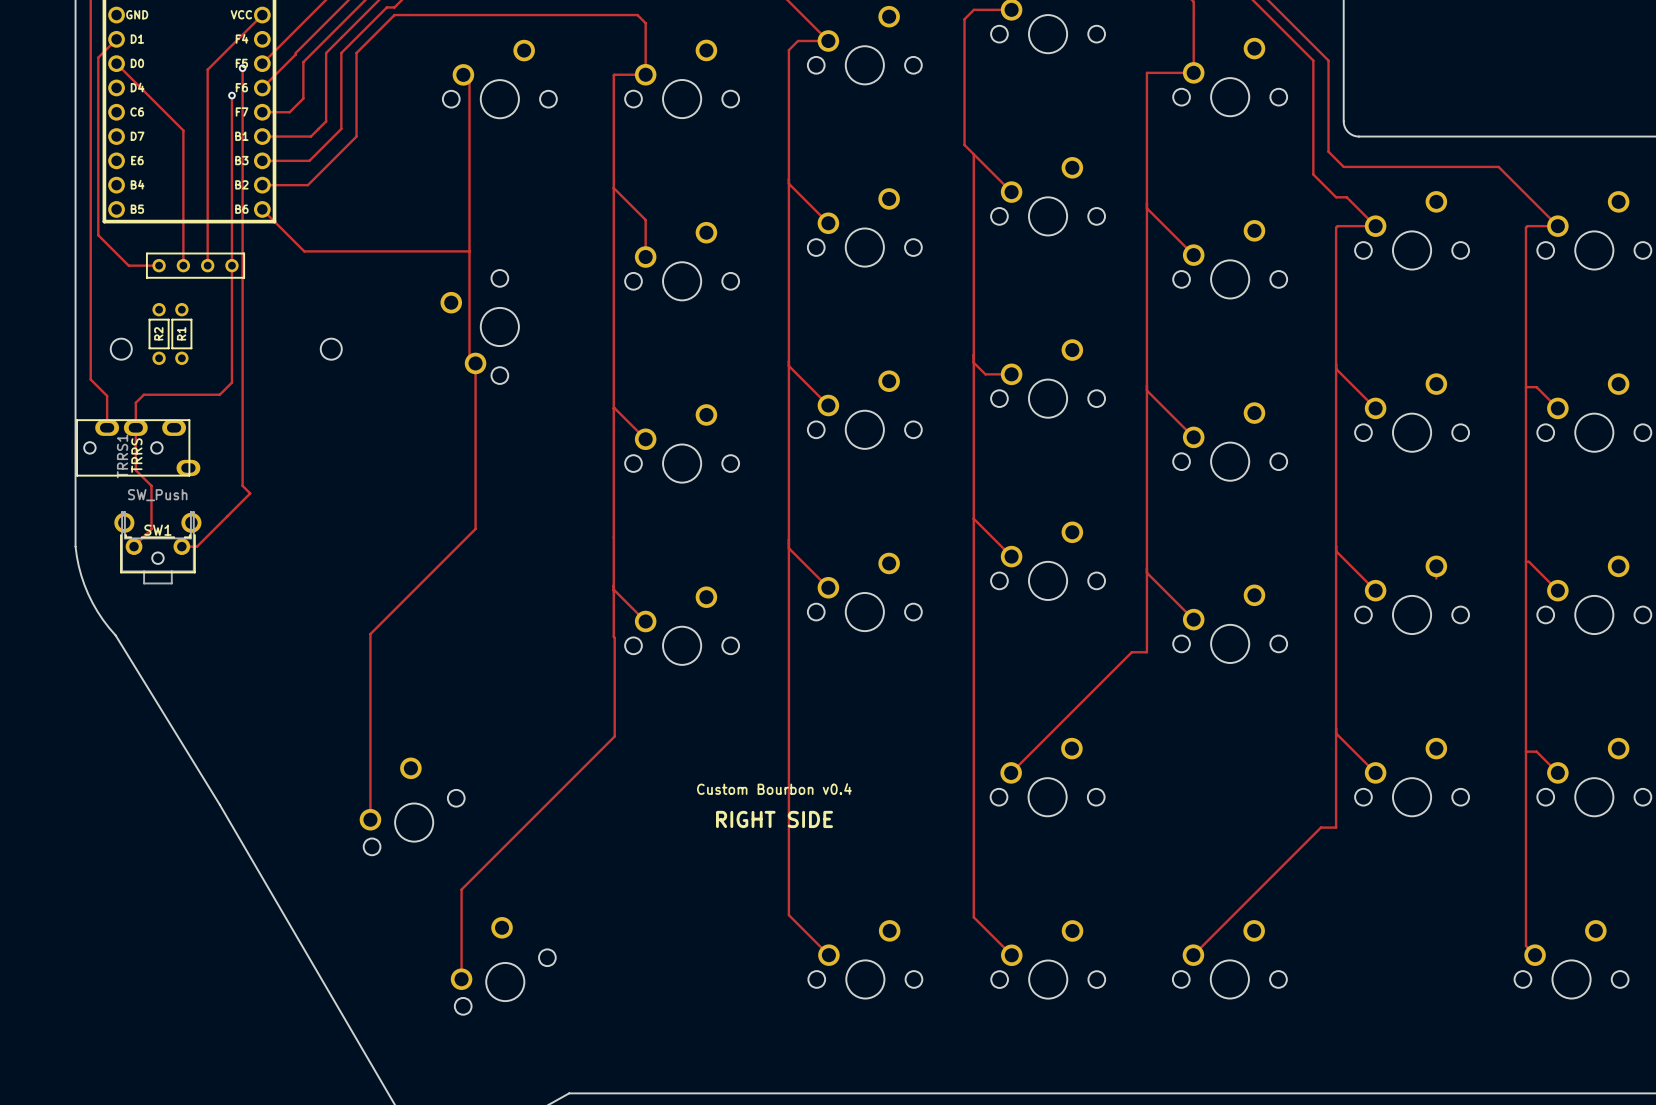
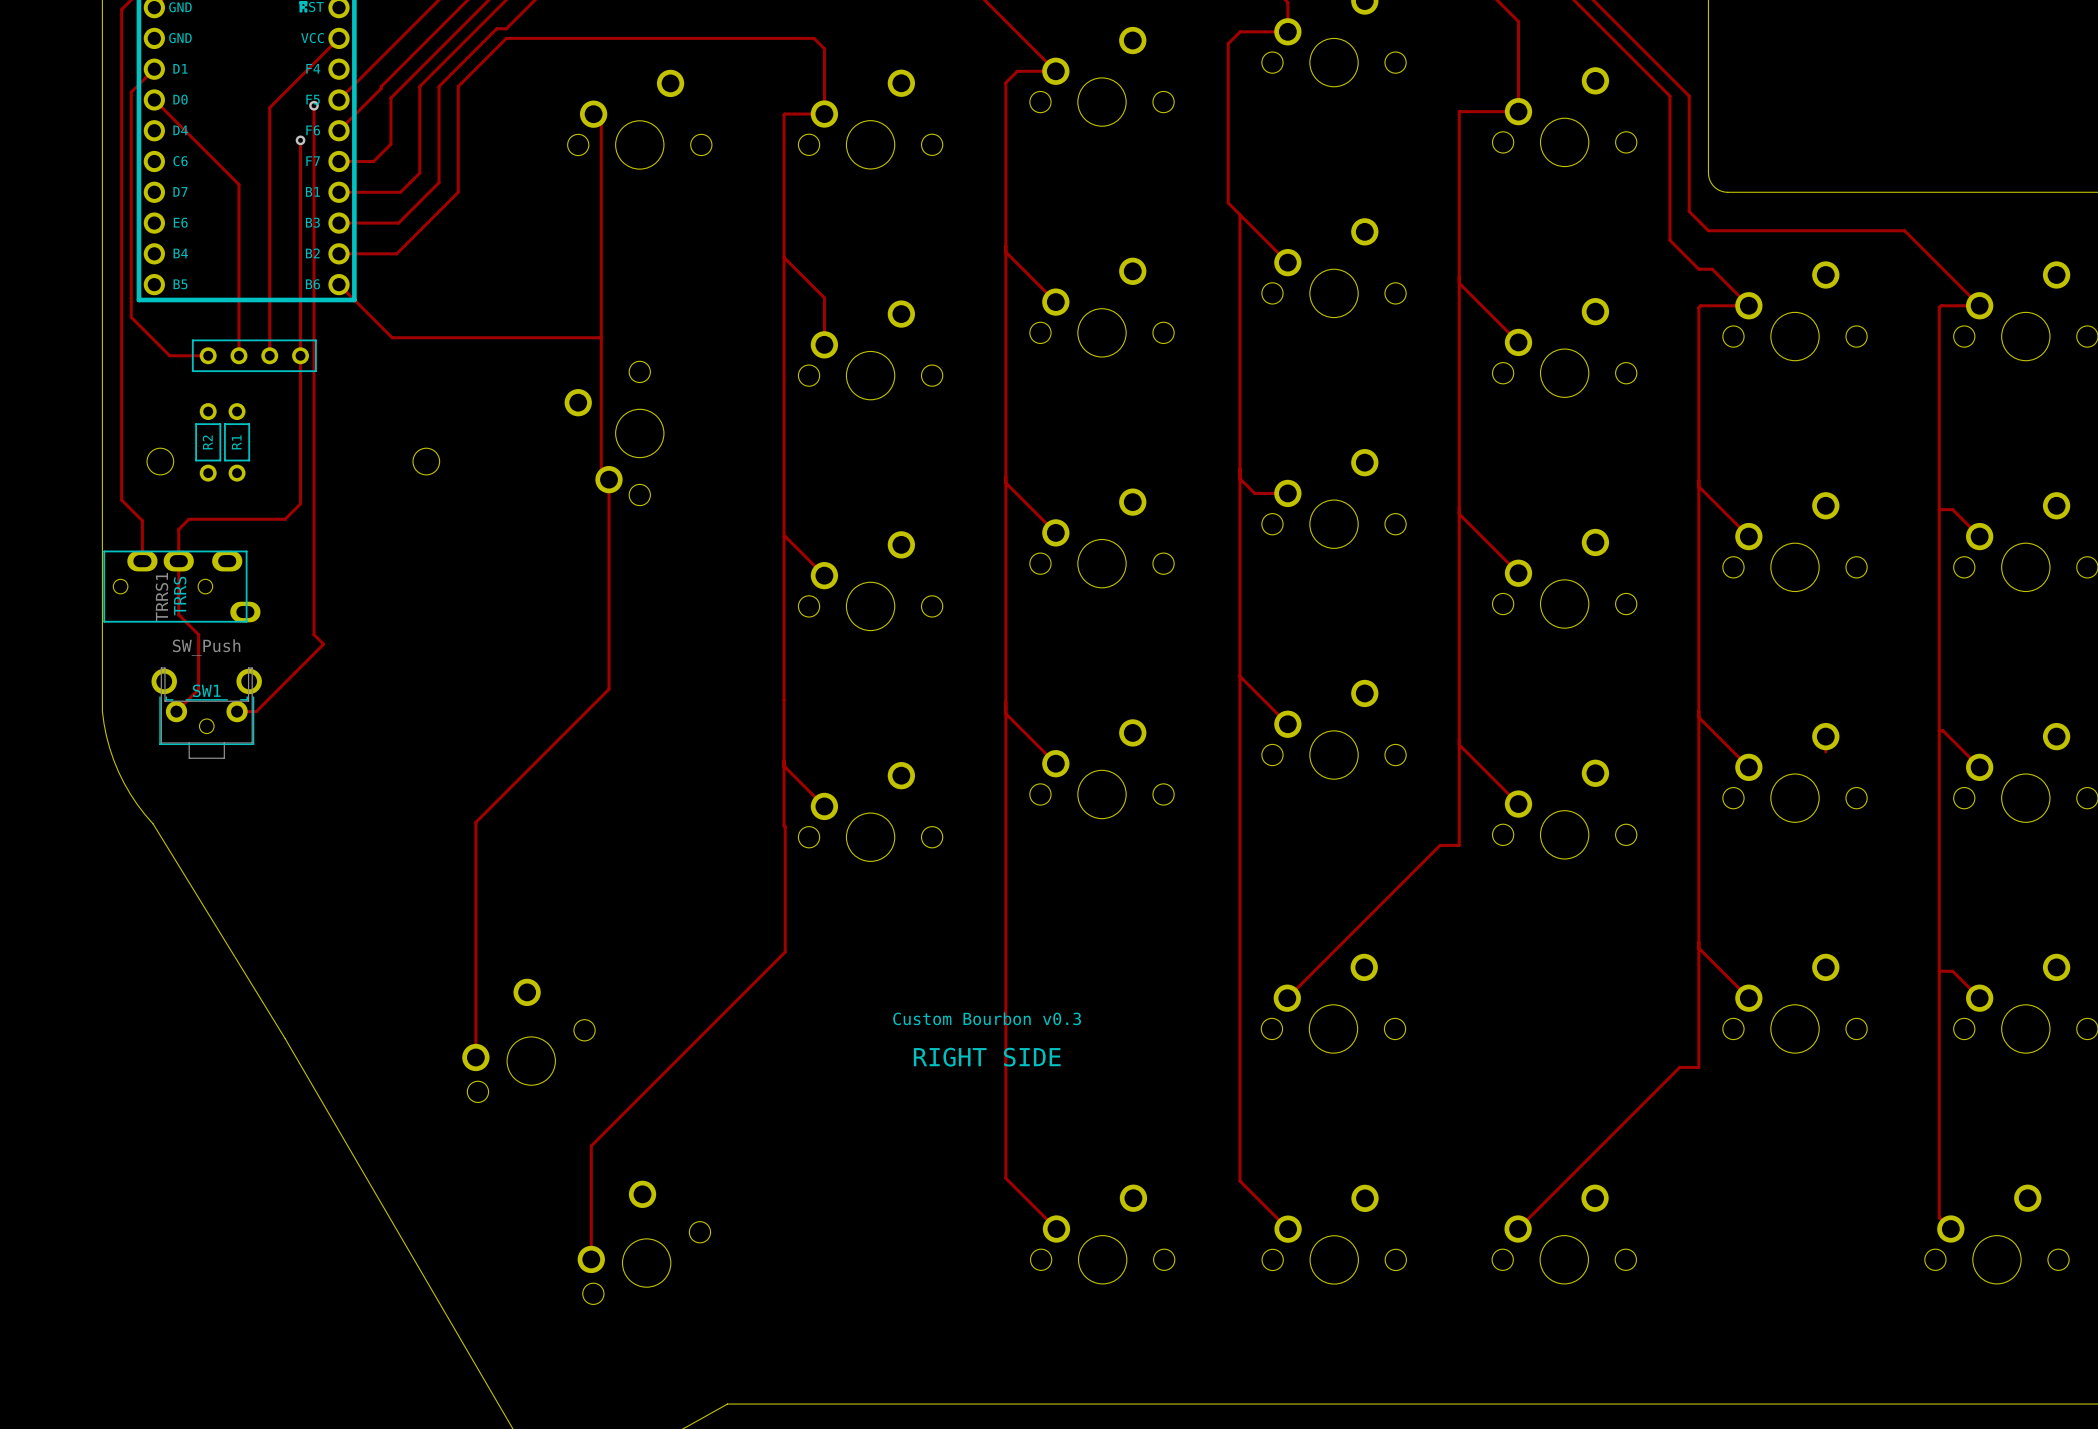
text: Custom Bourbon v0.4 (774, 789) -> Custom Bourbon v0.3 (987, 1018)

